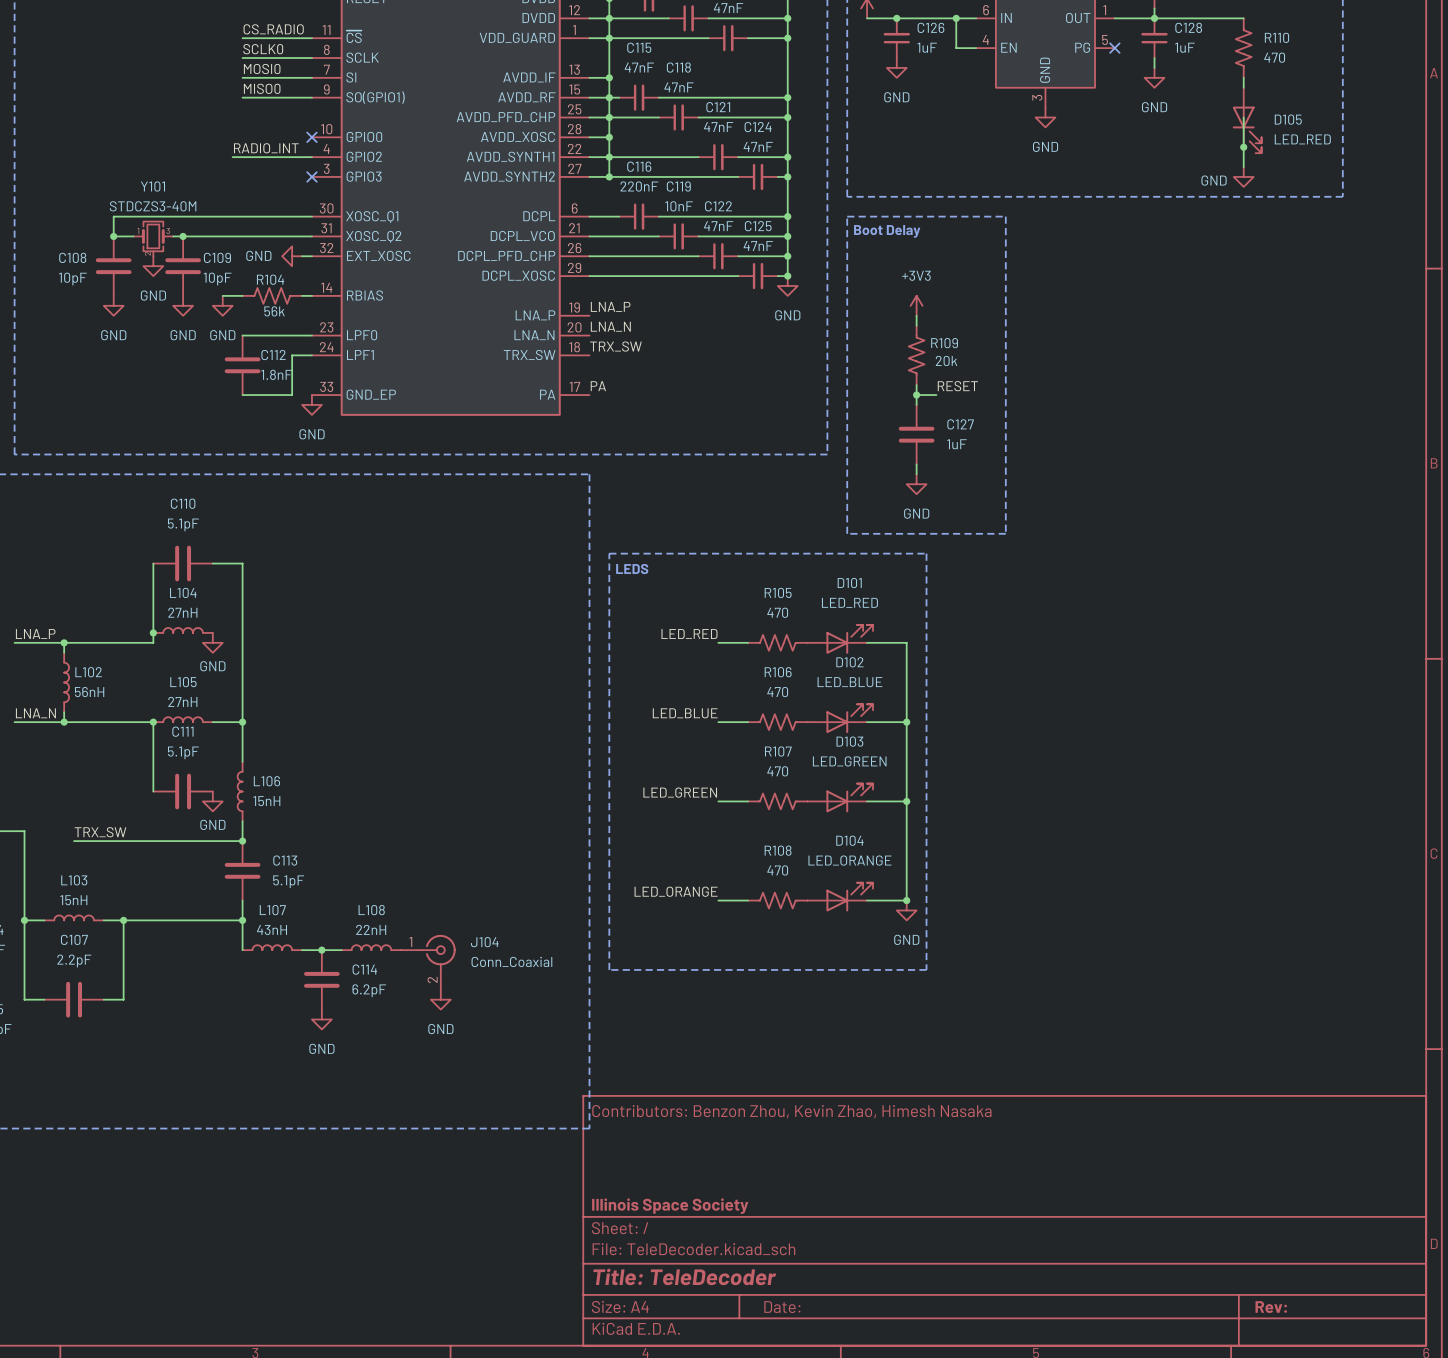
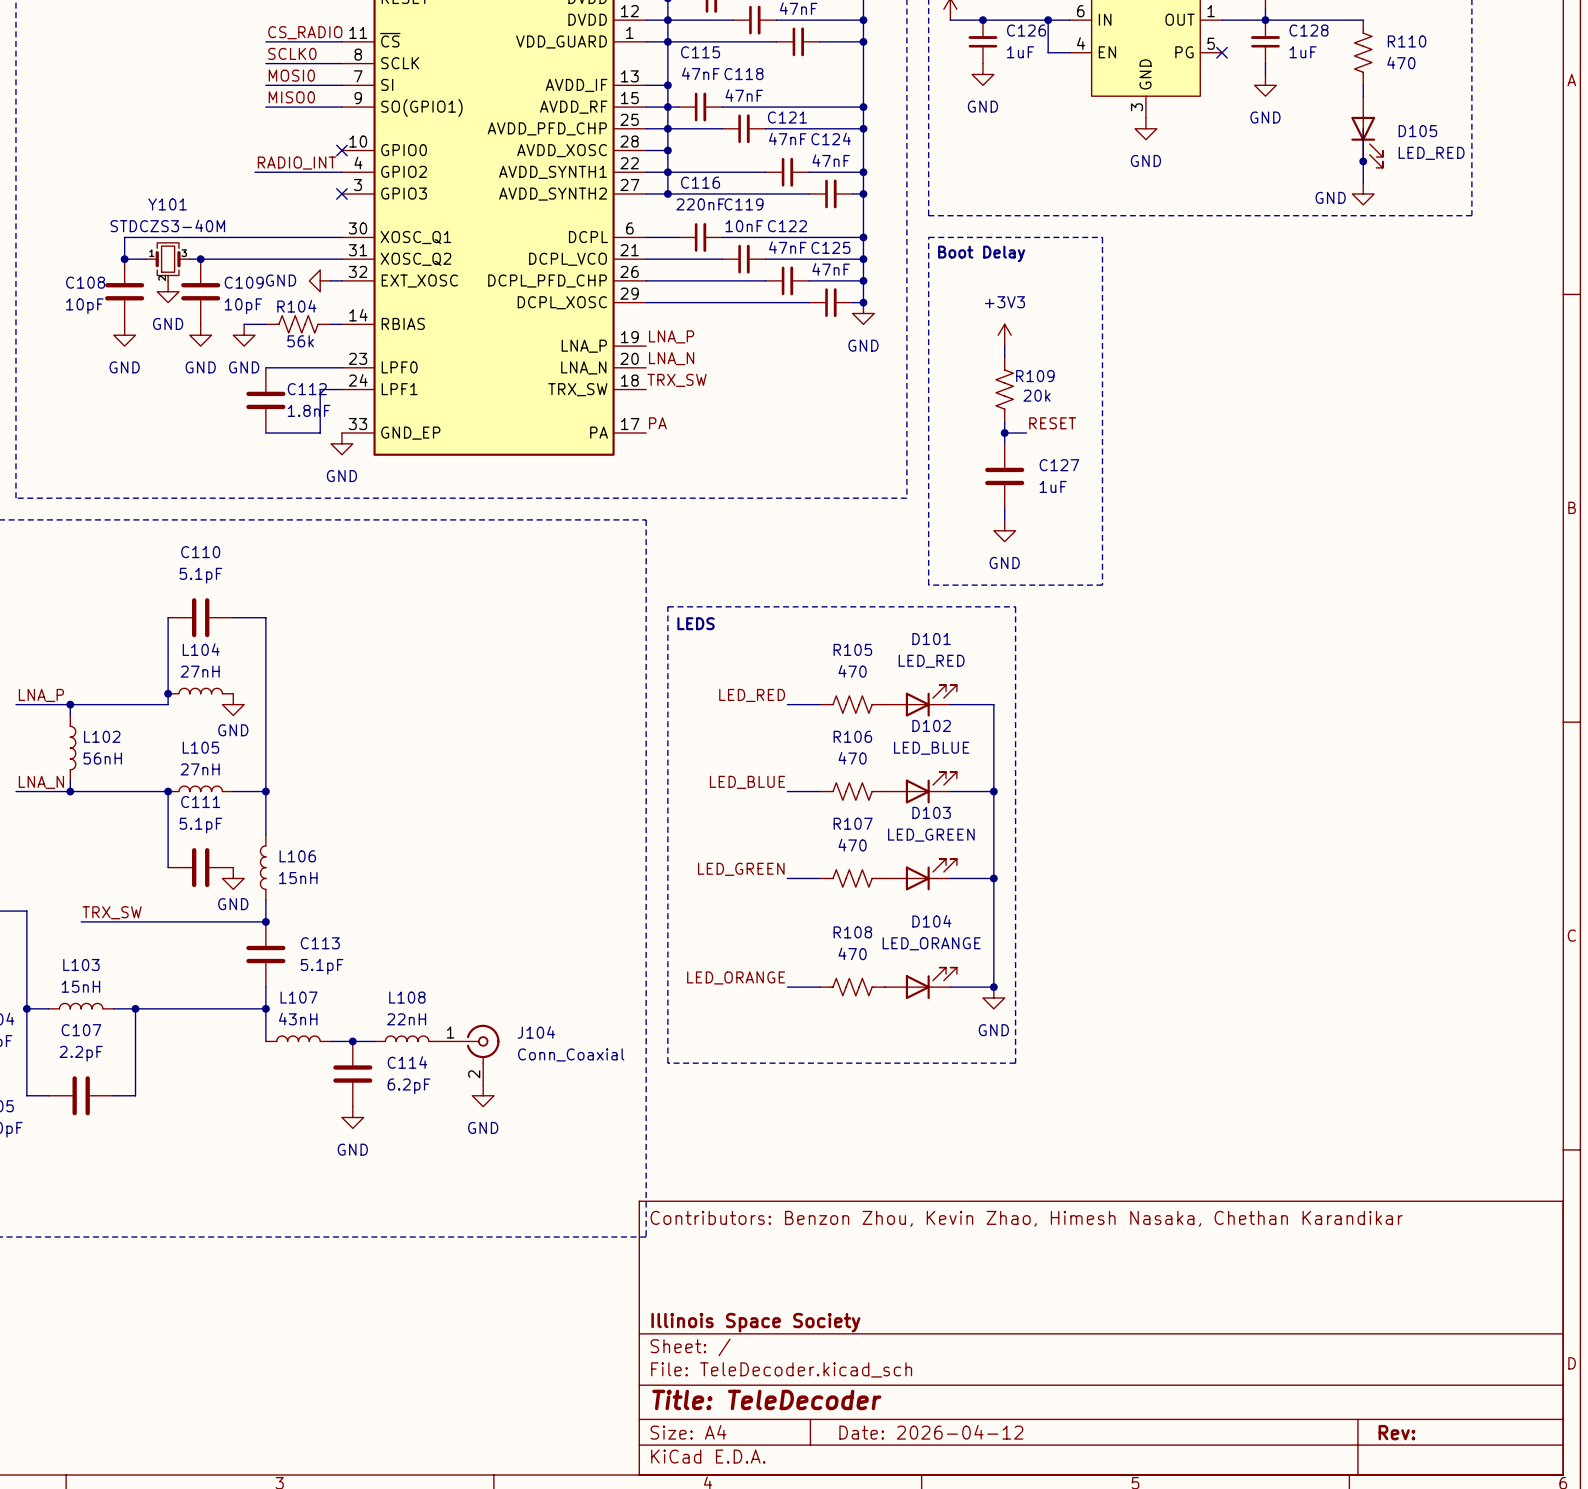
title block: Contributors: Benzon Zhou, Kevin Zhao, Himesh Nasaka (791, 1111) -> Contributors: Benzon Zhou, Kevin Zhao, Himesh Nasaka, Chethan Karandikar (1026, 1218)
title block: Date: (782, 1307) -> Date: 2026-04-12 (931, 1432)

